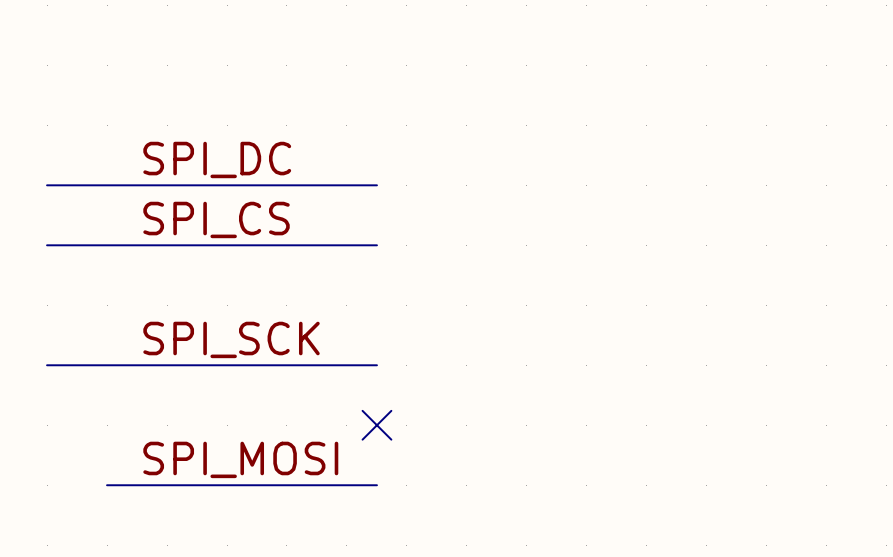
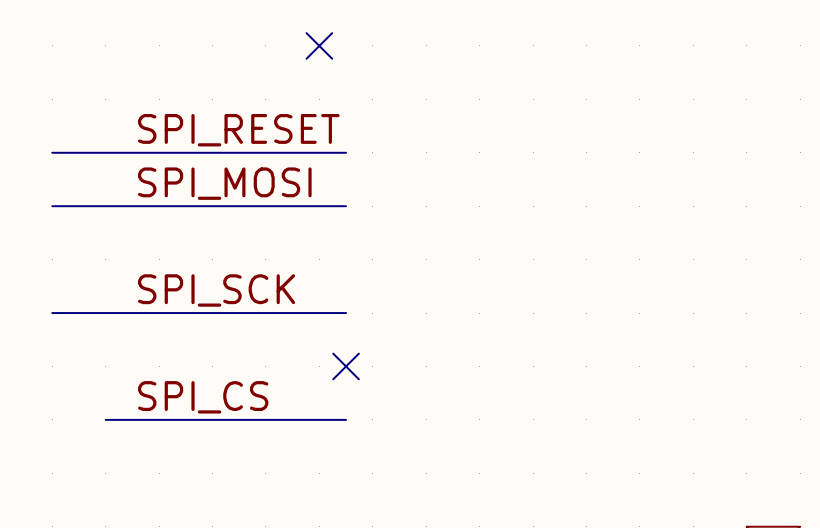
no-connect mark: none -> (319, 45)
label: SPI_DC (217, 159) -> SPI_RESET (238, 130)
label: SPI_CS (216, 219) -> SPI_MOSI (224, 183)
label: SPI_MOSI (240, 459) -> SPI_CS (203, 397)

